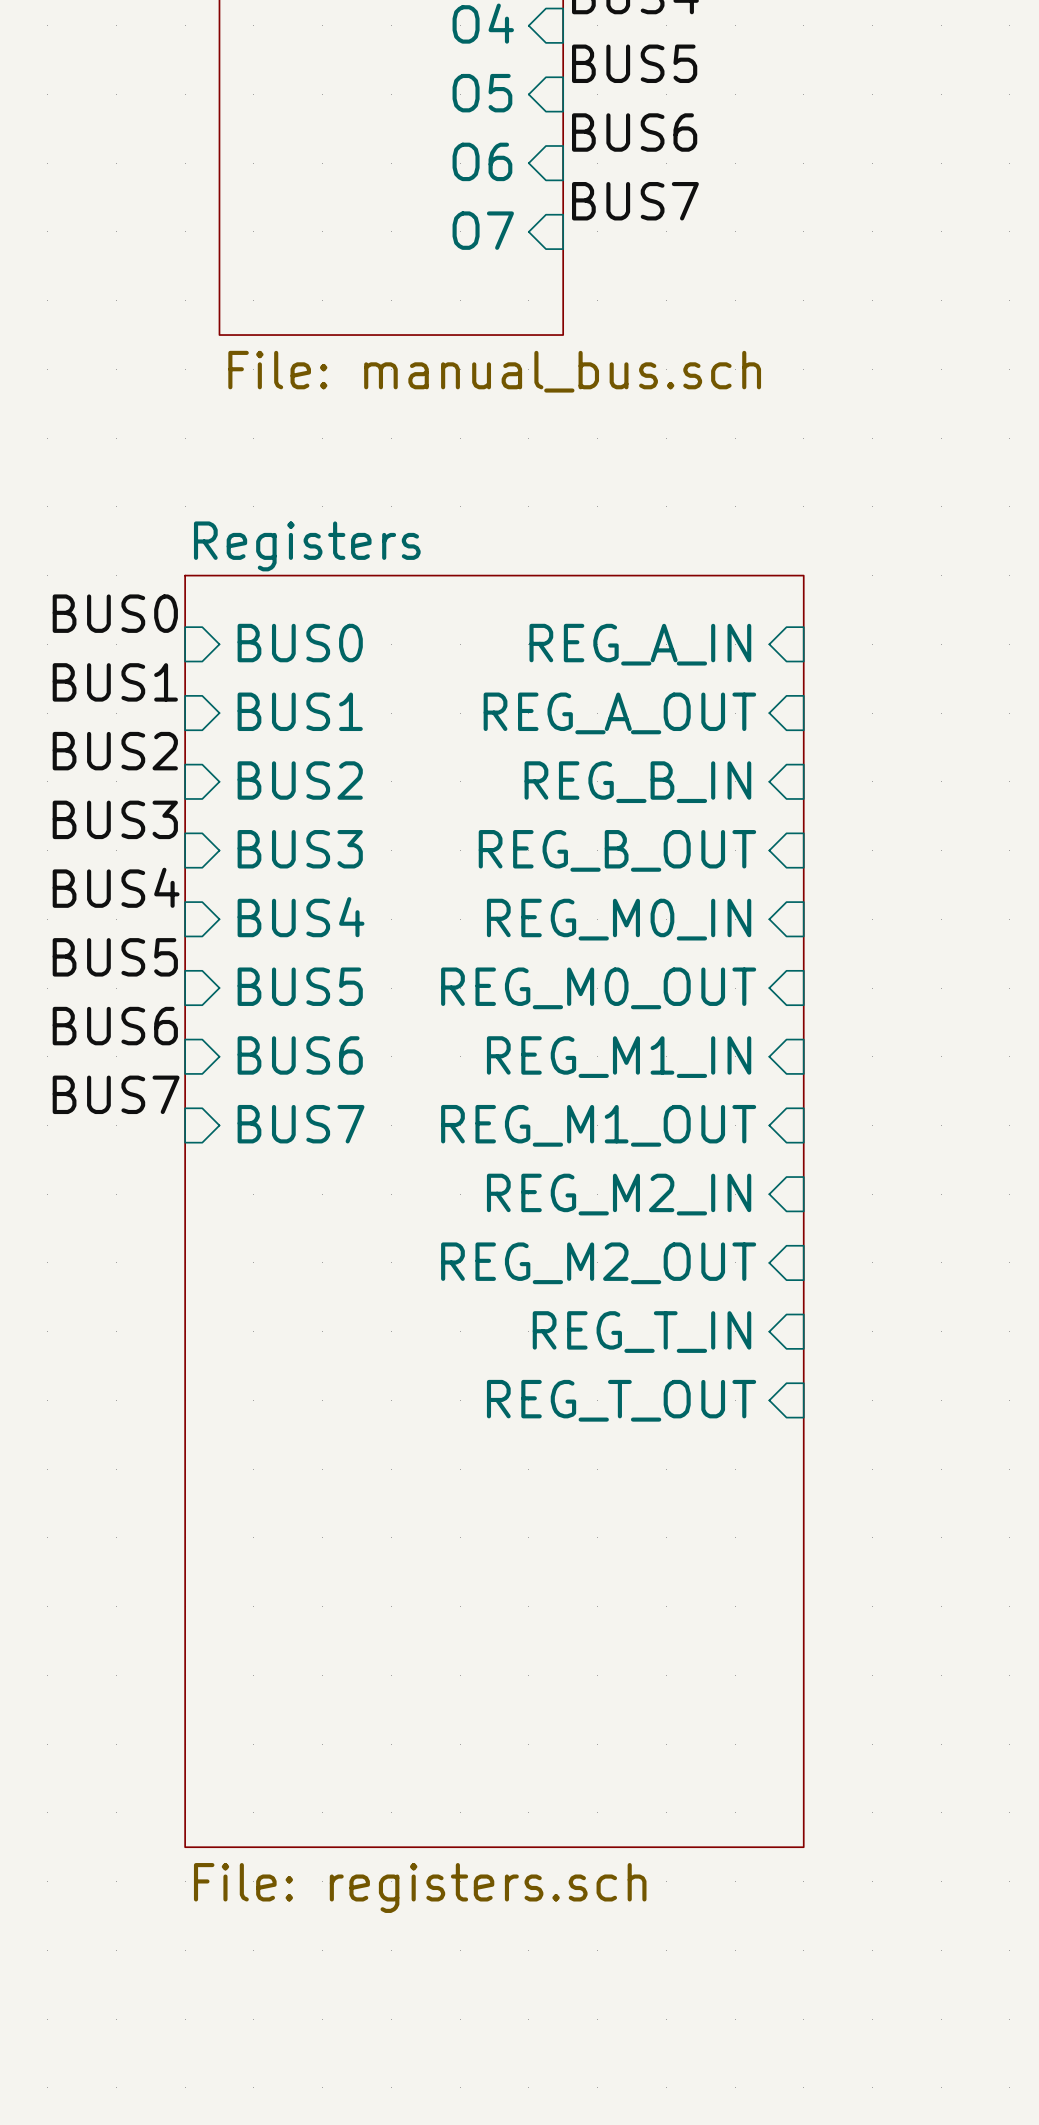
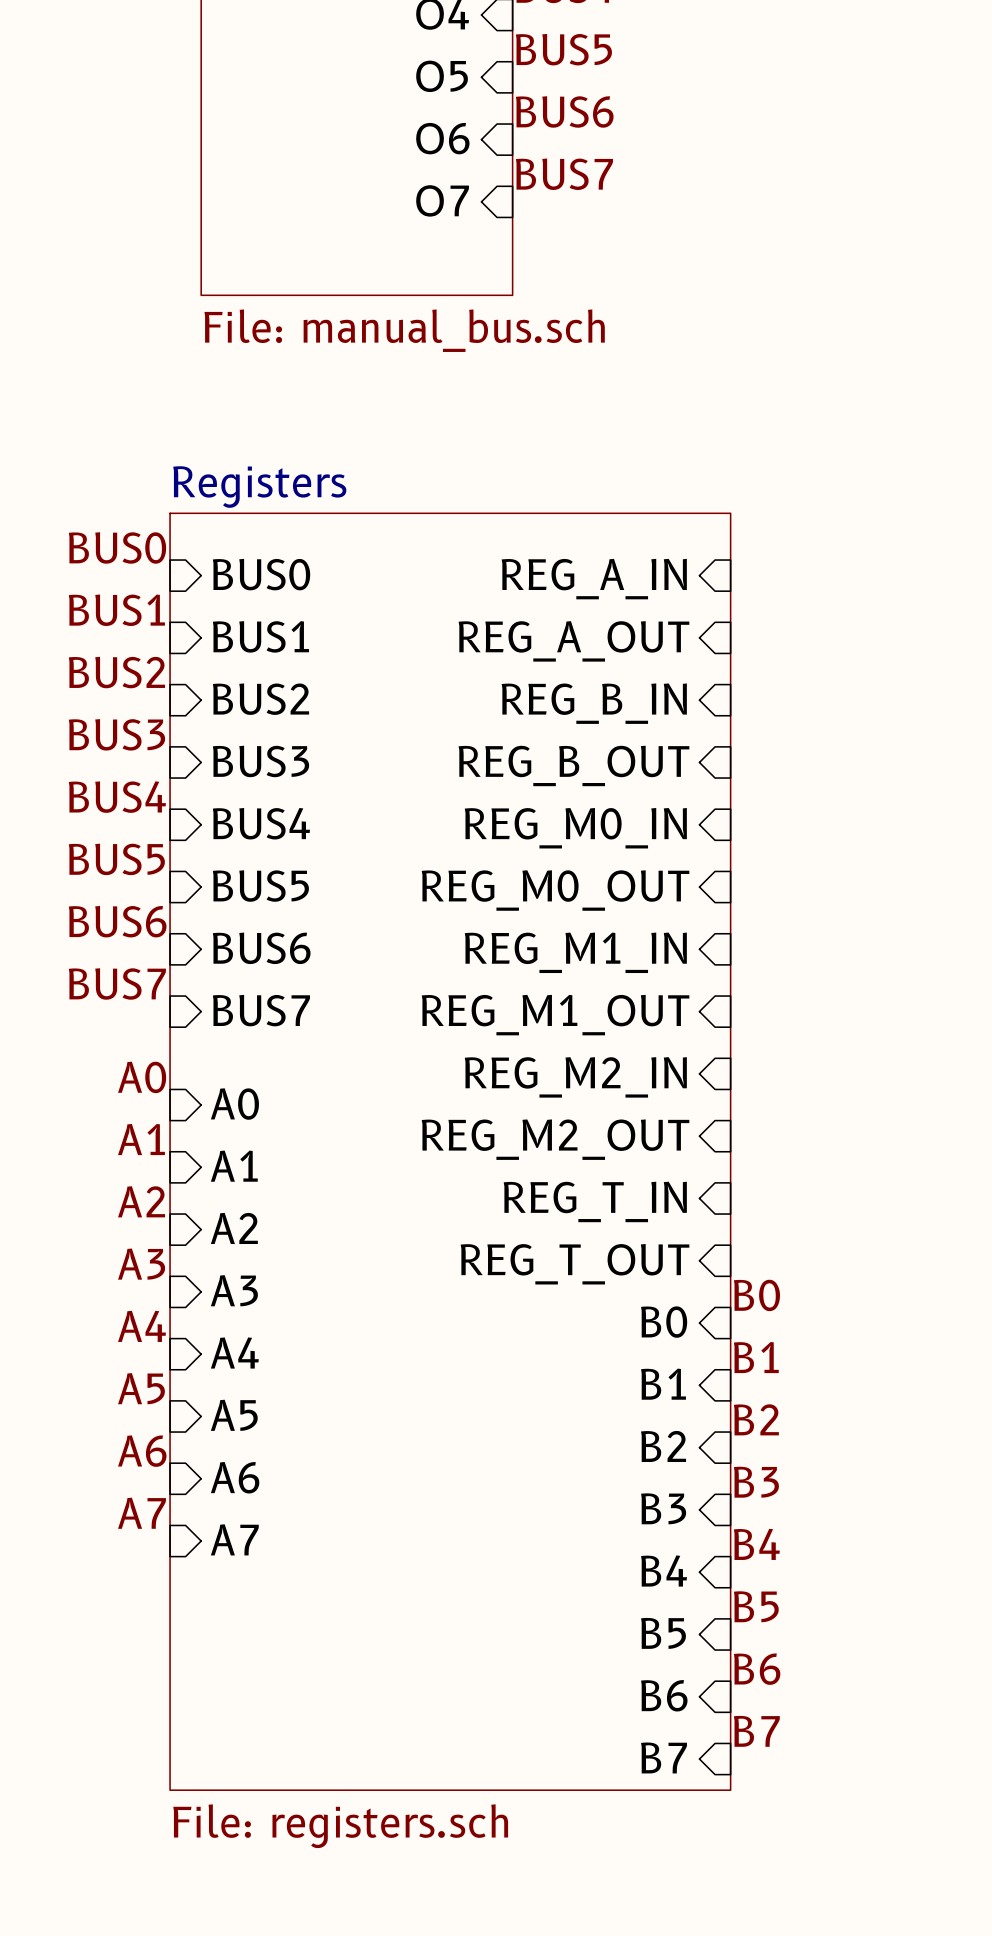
label: none -> A0 (142, 1077)
sheet Registers: File: registers.sch (494, 1211) -> none
sheet pin: none -> A0 (234, 1104)
label: none -> A1 (141, 1139)
sheet Registers: none -> File: registers.sch (450, 1151)
sheet pin: none -> A1 (234, 1166)
label: none -> A2 (141, 1201)
sheet pin: none -> A2 (234, 1228)
label: none -> A3 (141, 1264)
sheet pin: none -> A3 (234, 1290)
label: none -> B0 (756, 1295)
sheet pin: none -> B0 (664, 1322)
label: none -> A4 (141, 1326)
sheet pin: none -> A4 (234, 1353)
label: none -> B1 (756, 1357)
sheet pin: none -> B1 (663, 1384)
label: none -> A5 (141, 1388)
sheet pin: none -> A5 (234, 1415)
label: none -> B2 (756, 1419)
sheet pin: none -> B2 (663, 1446)
label: none -> A6 (142, 1451)
sheet pin: none -> A6 (235, 1477)
label: none -> B3 (756, 1482)
sheet pin: none -> B3 (663, 1508)
label: none -> A7 (141, 1513)
sheet pin: none -> A7 (234, 1539)
label: none -> B4 (756, 1544)
sheet pin: none -> B4 (664, 1571)
label: none -> B5 (756, 1606)
sheet pin: none -> B5 (663, 1633)
label: none -> B6 (757, 1669)
sheet pin: none -> B6 (664, 1695)
label: none -> B7 (756, 1731)
sheet pin: none -> B7 (664, 1757)

